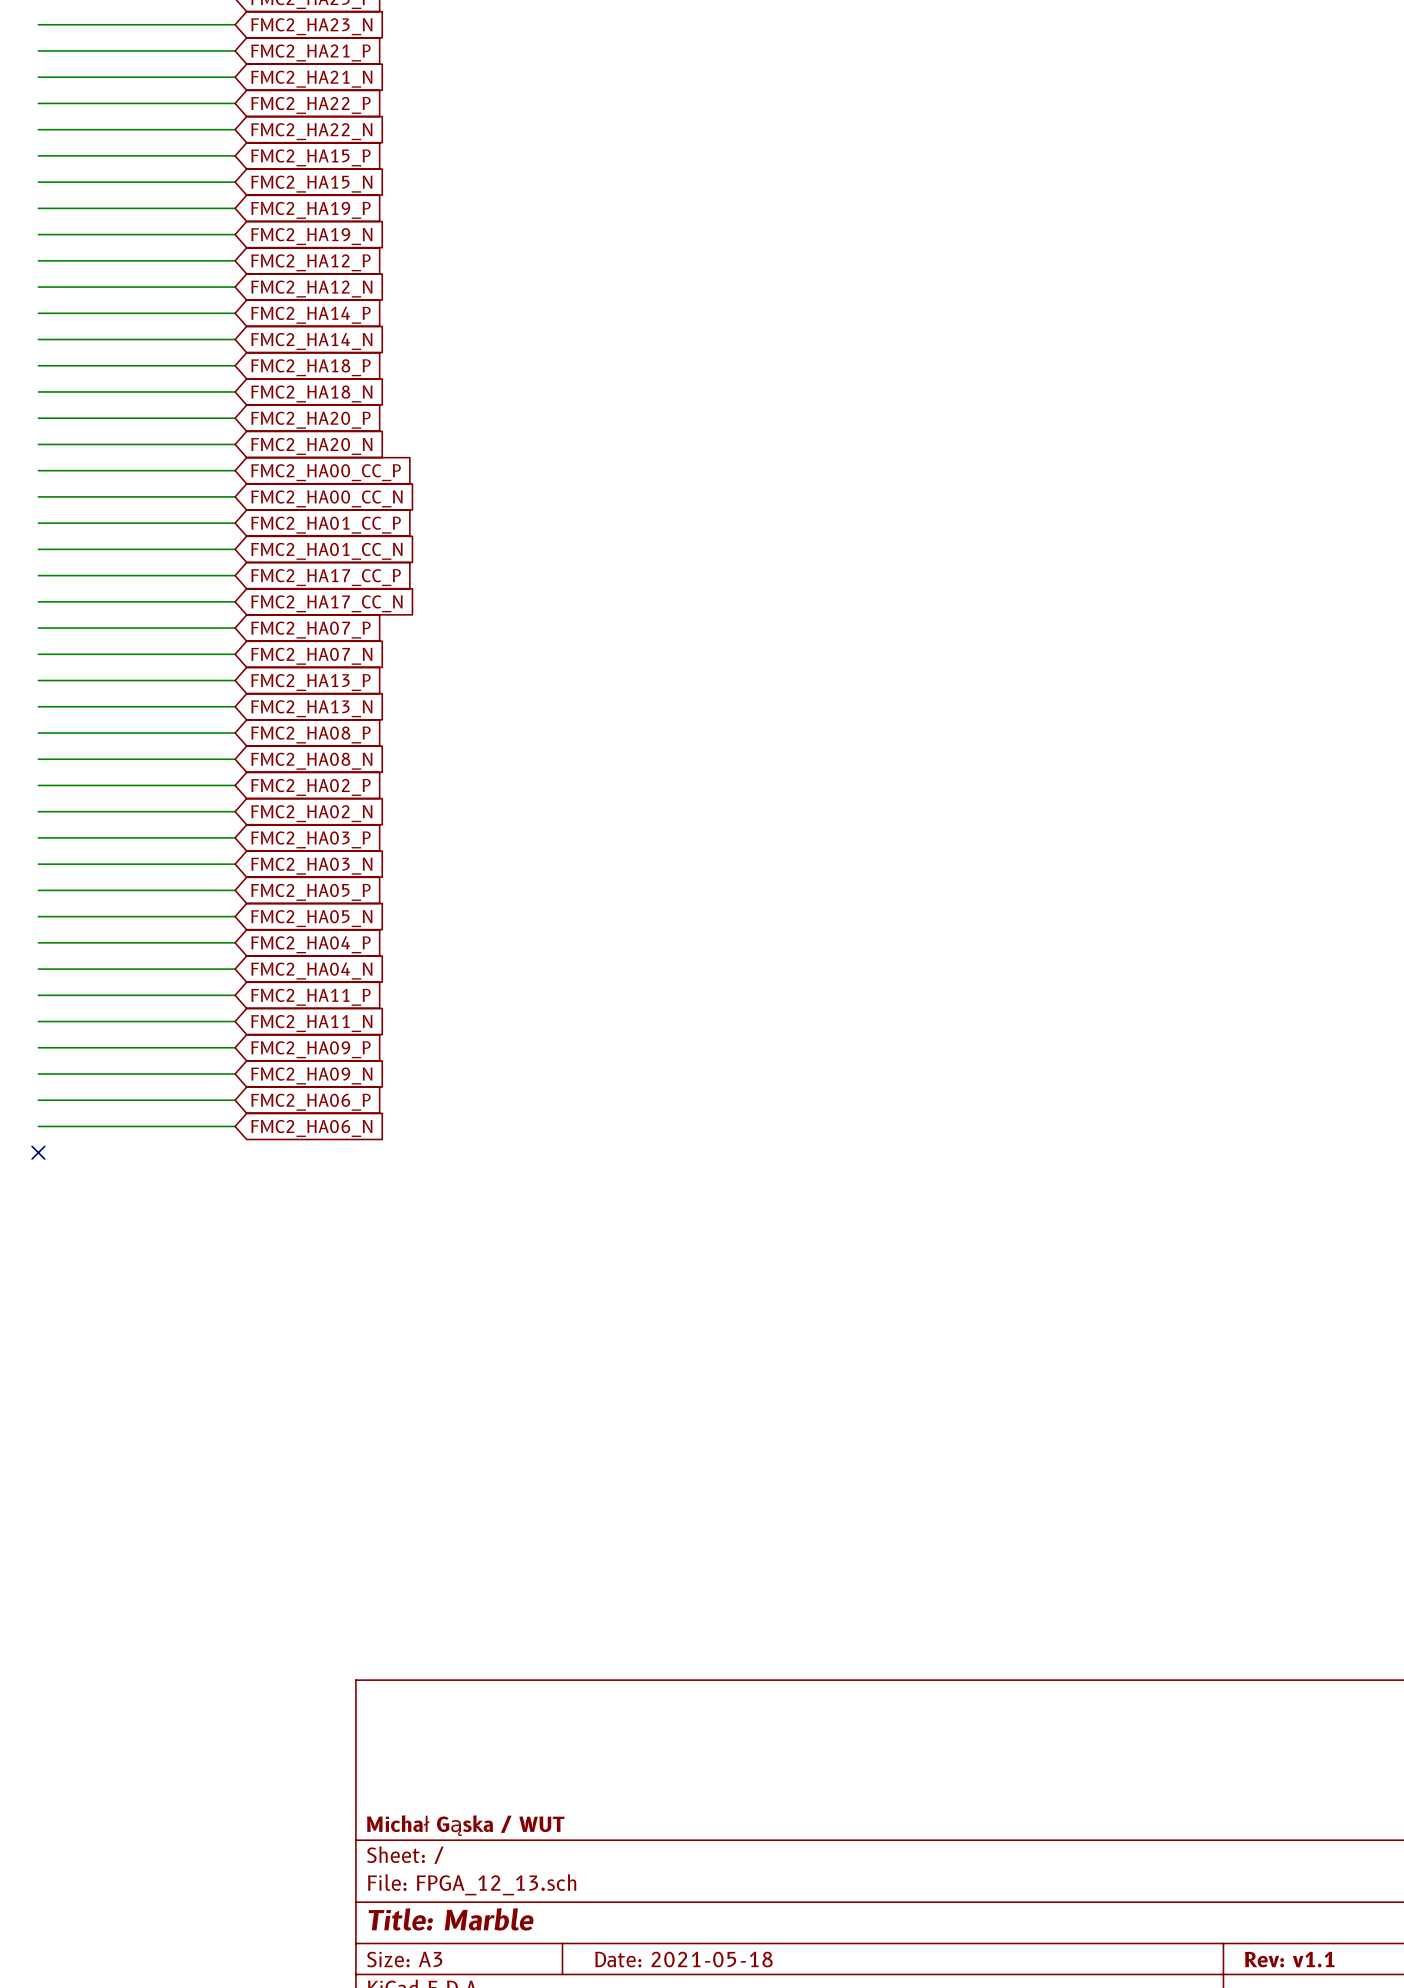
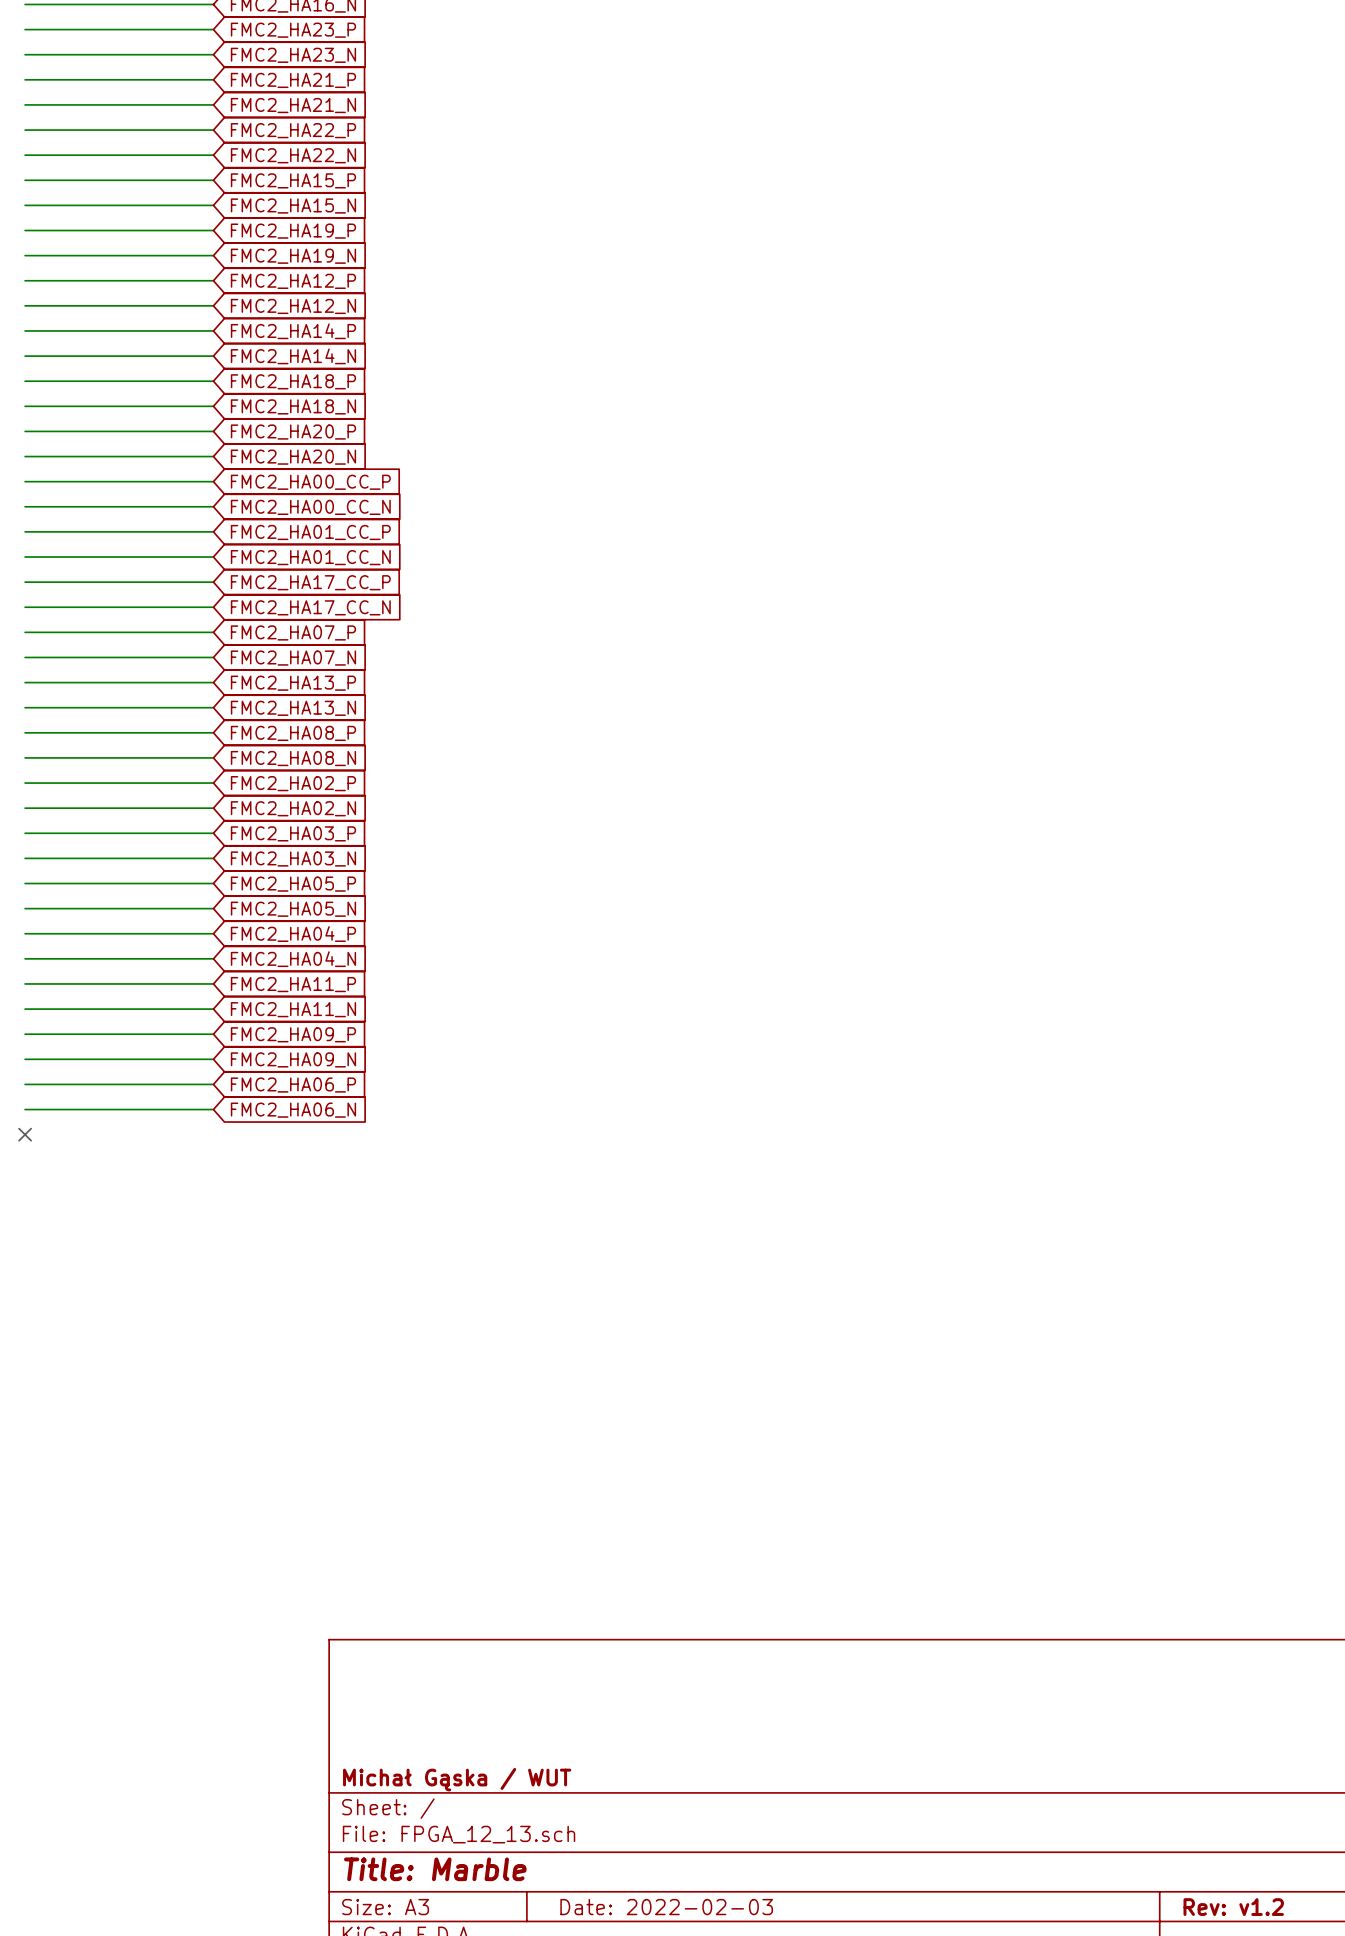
title block: Date: 2021-05-18 (683, 1959) -> Date: 2022-02-03 (666, 1907)
title block: Rev: v1.1 (1289, 1959) -> Rev: v1.2 (1233, 1907)

